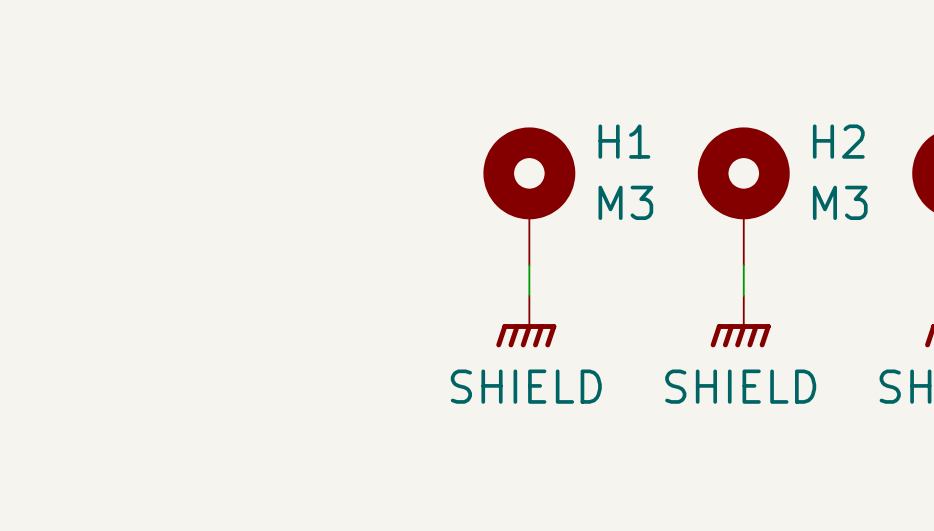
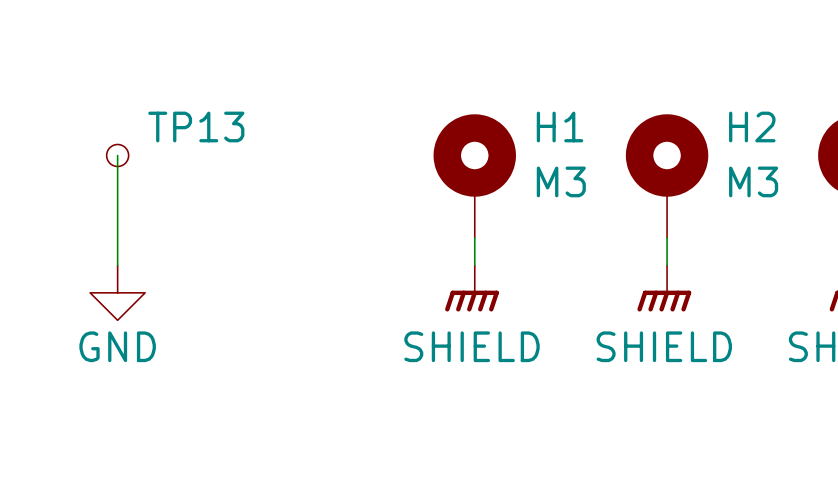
wire: none -> (117, 155) (117, 265)
TP13: none -> (117, 155)
power symbol: none -> GND (117, 292)

